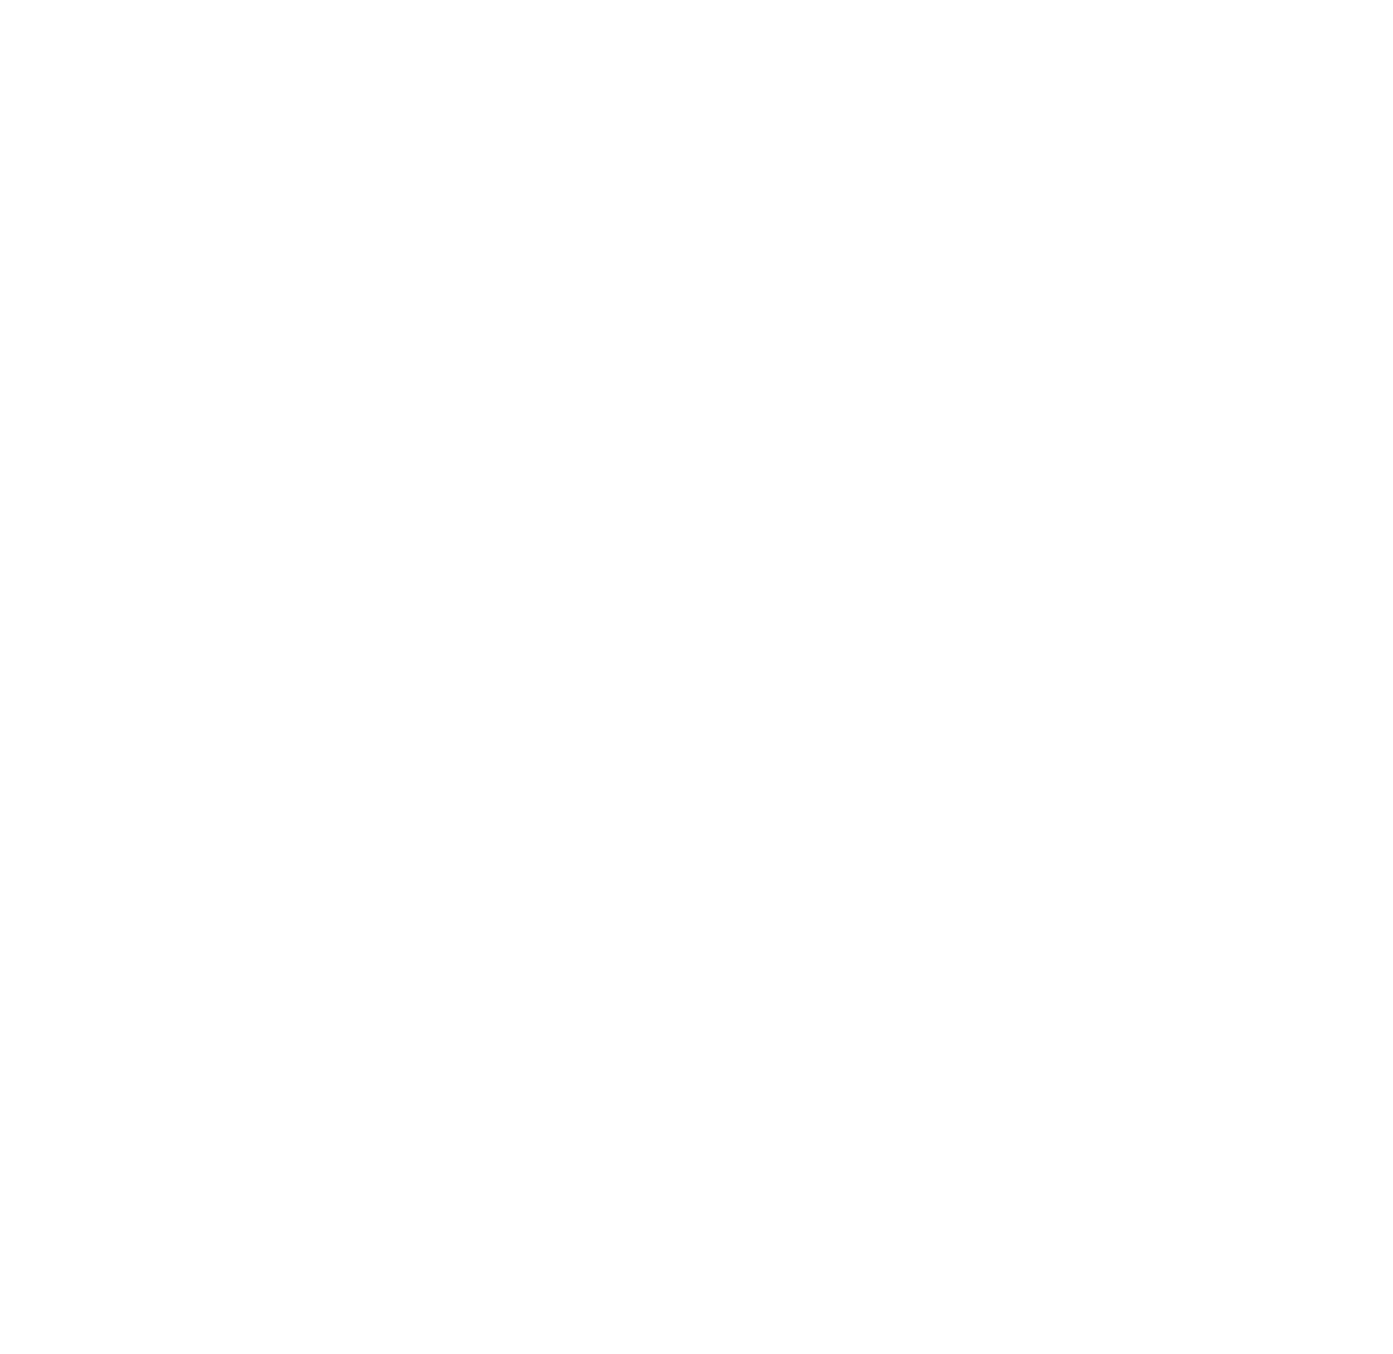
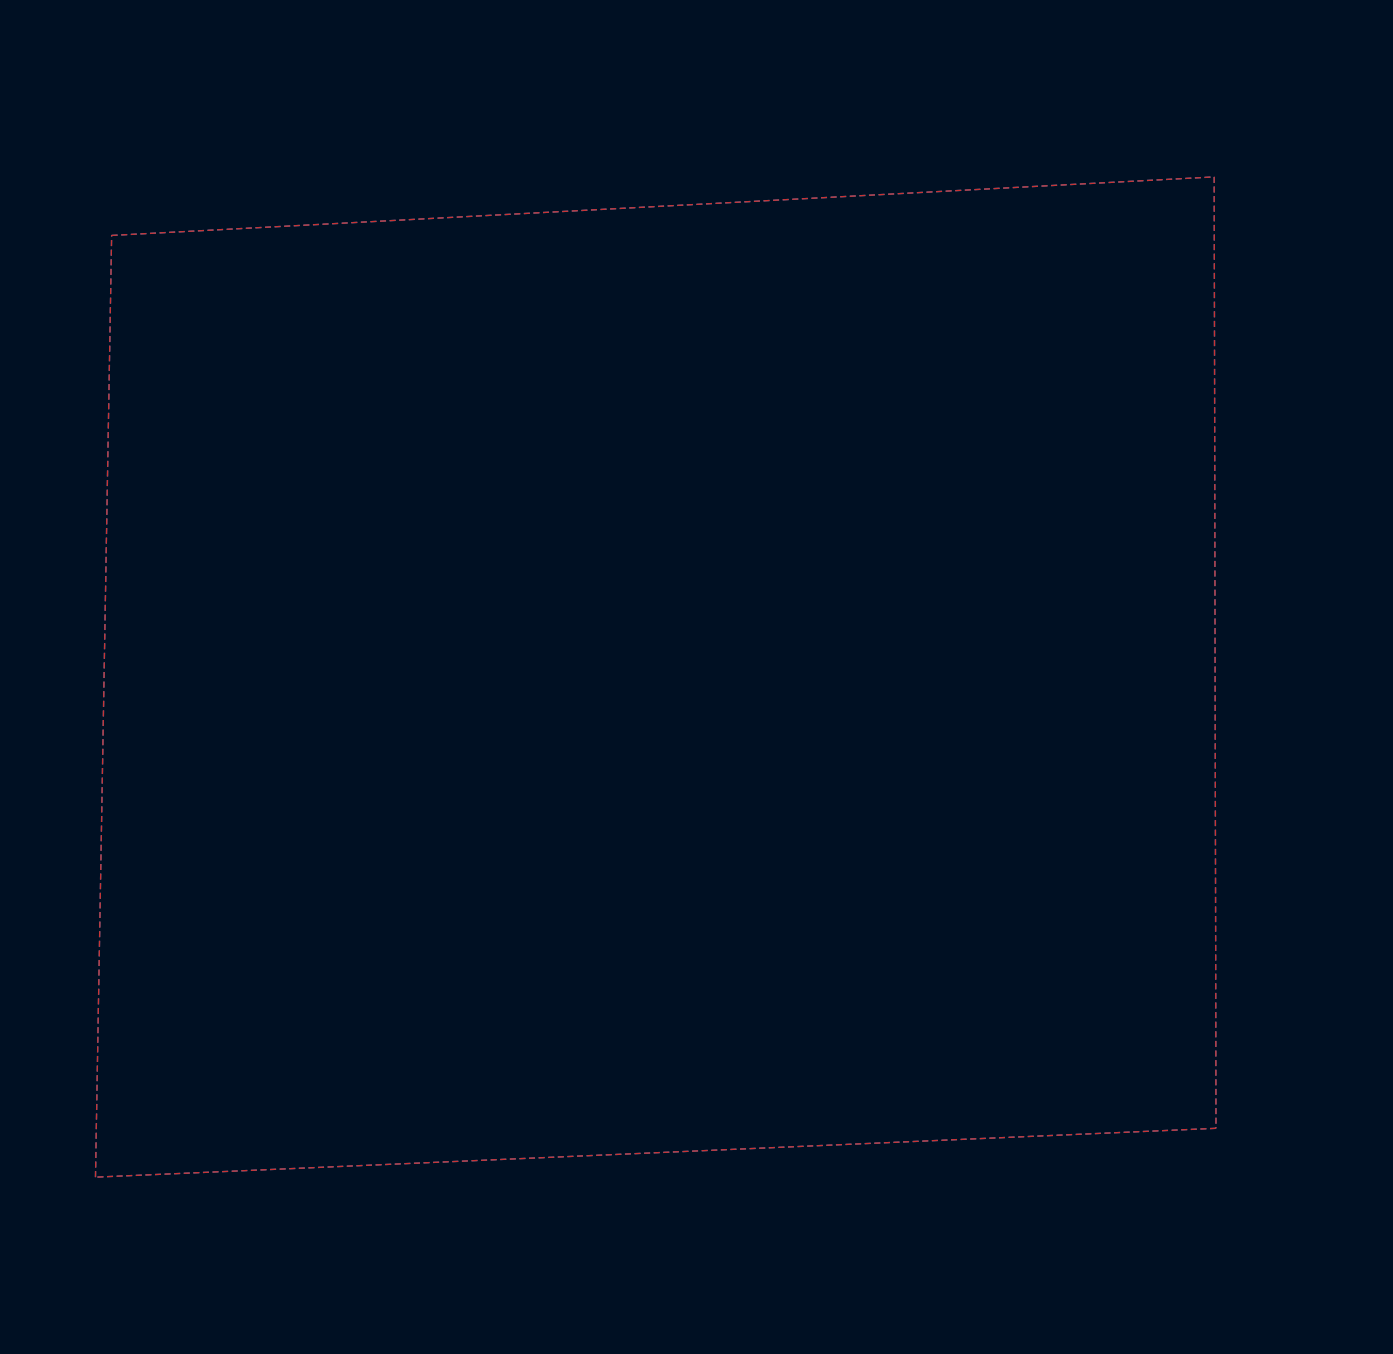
top zone outline: none -> (1214, 176) (111, 235) (95, 1177) (1215, 1128) (1214, 176)

